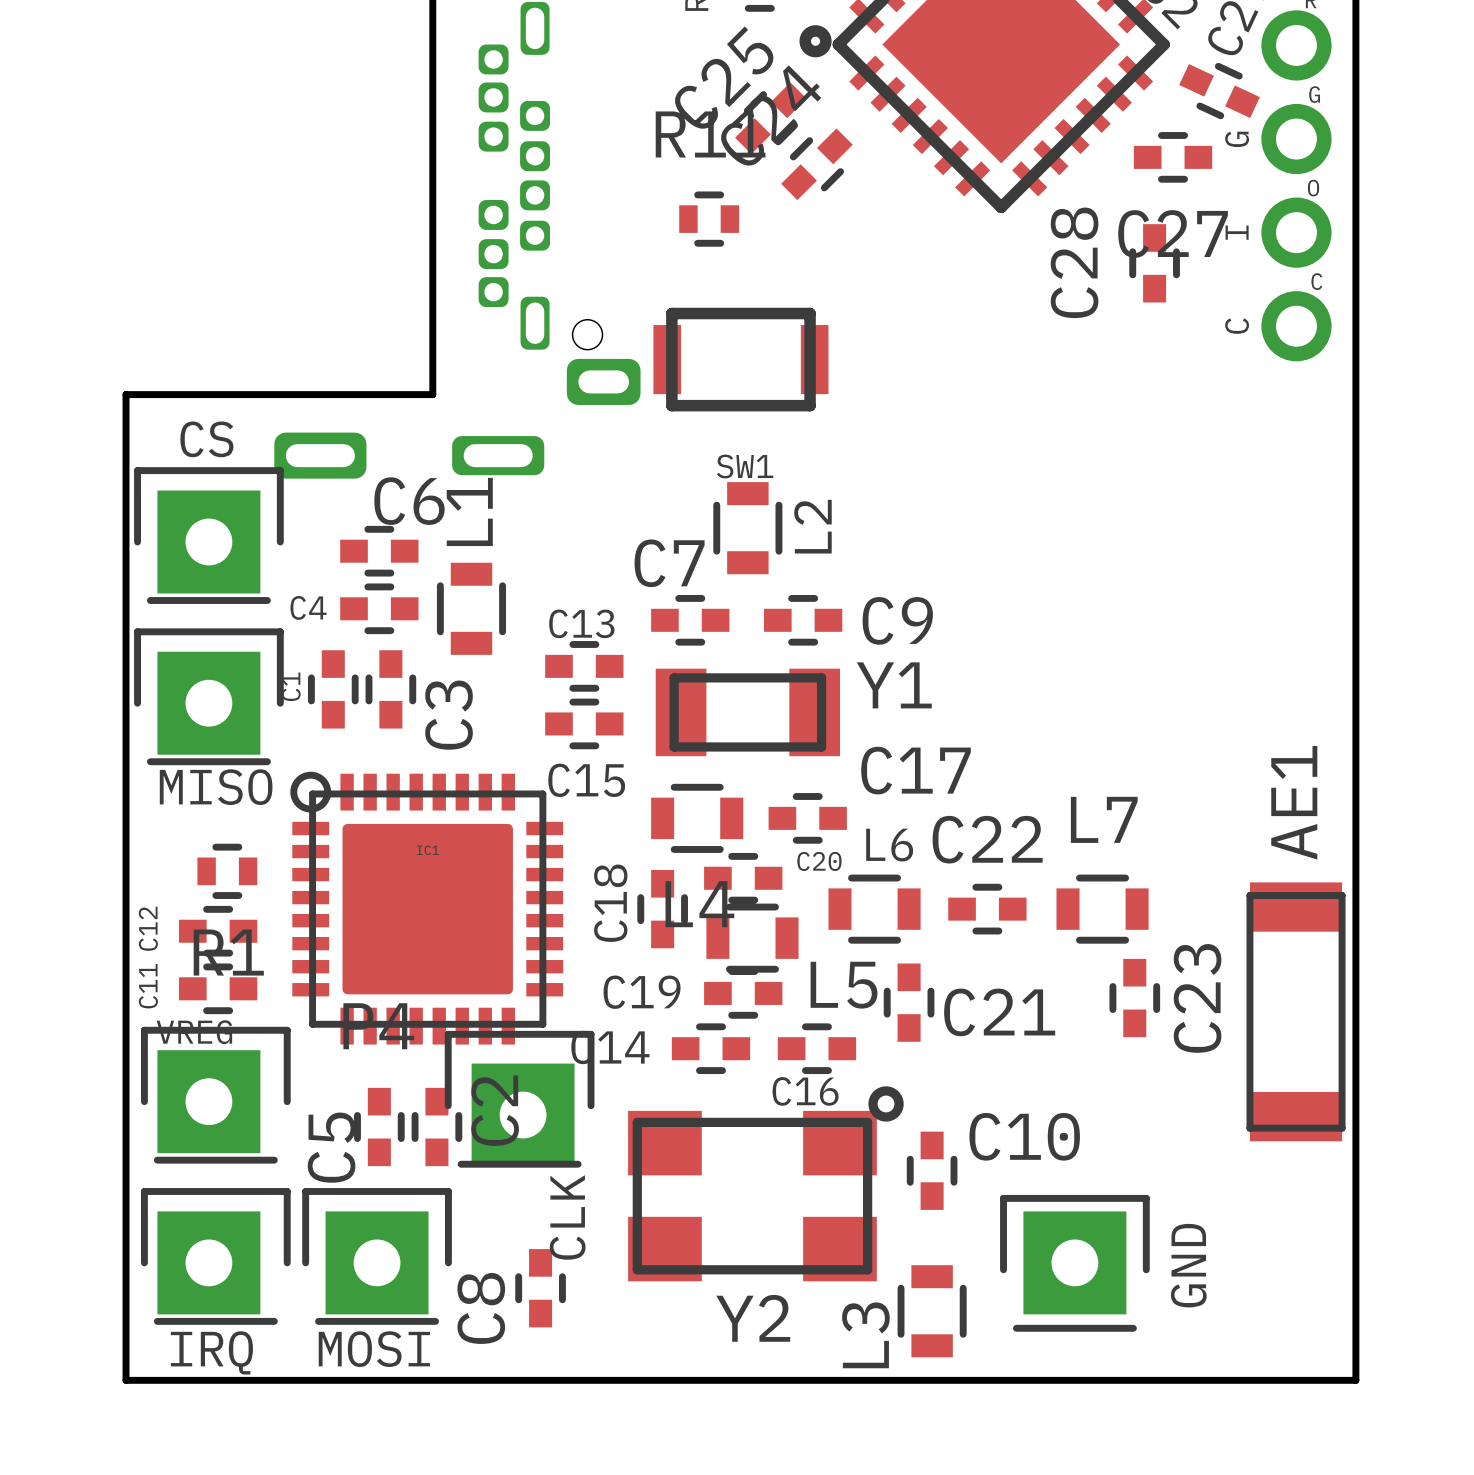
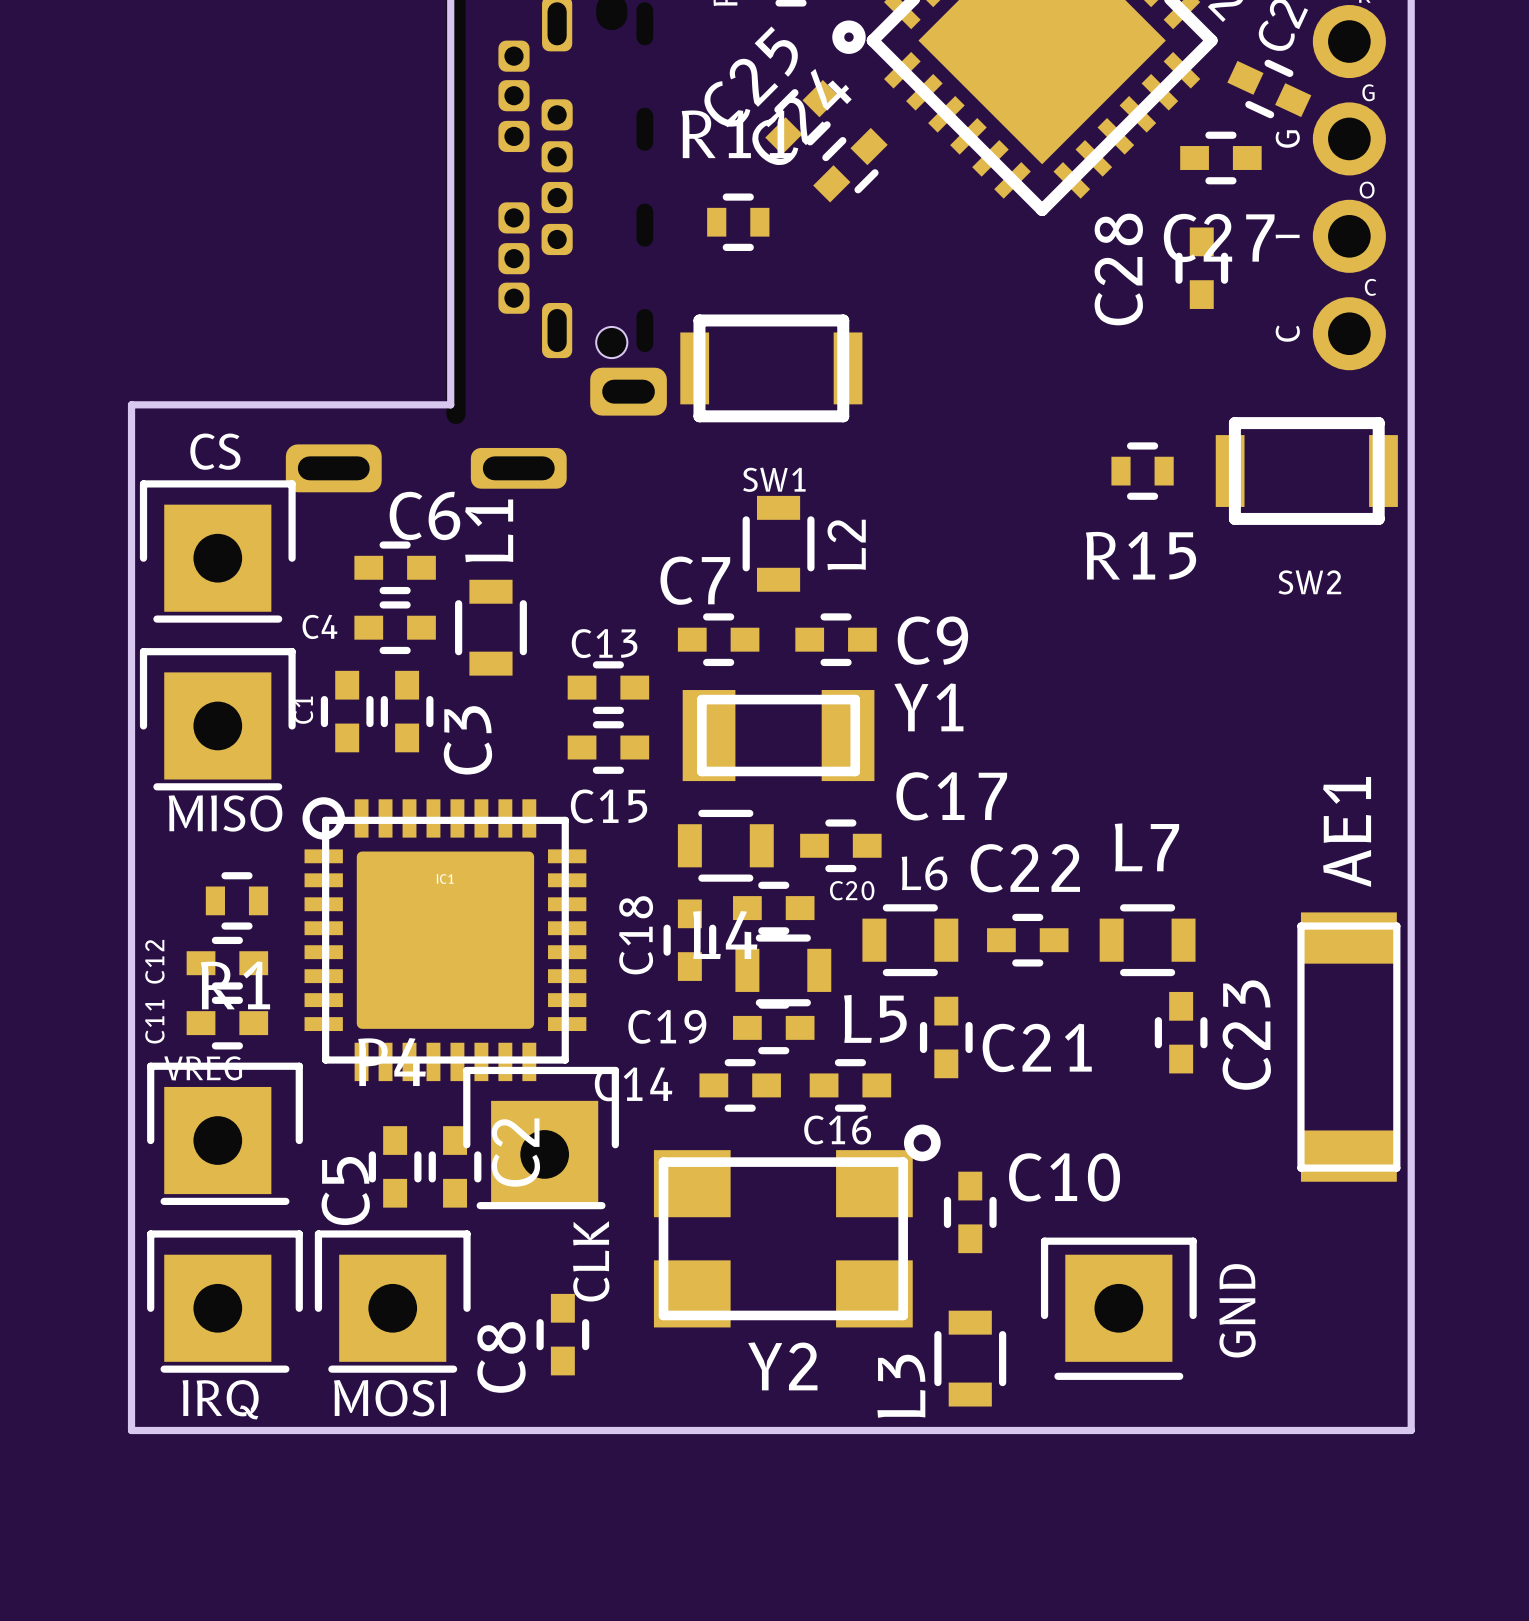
R15: none -> (1142, 471)
SW2: none -> (1306, 471)

